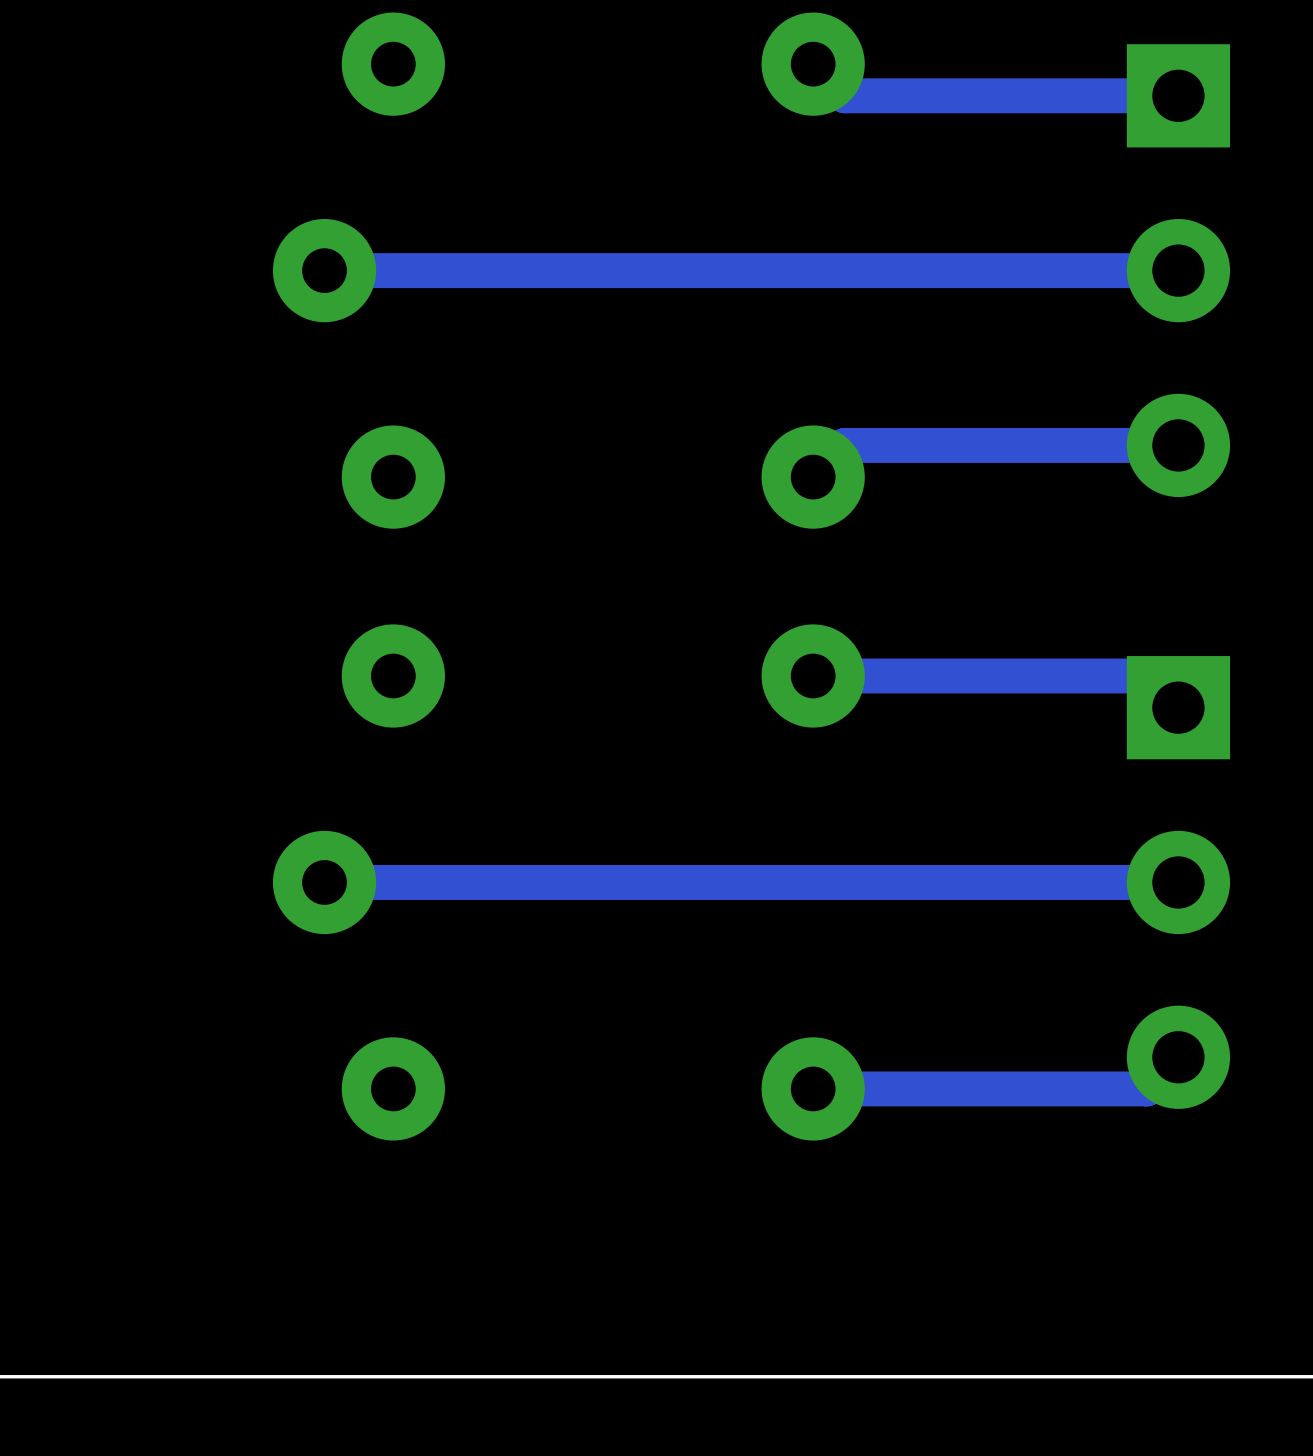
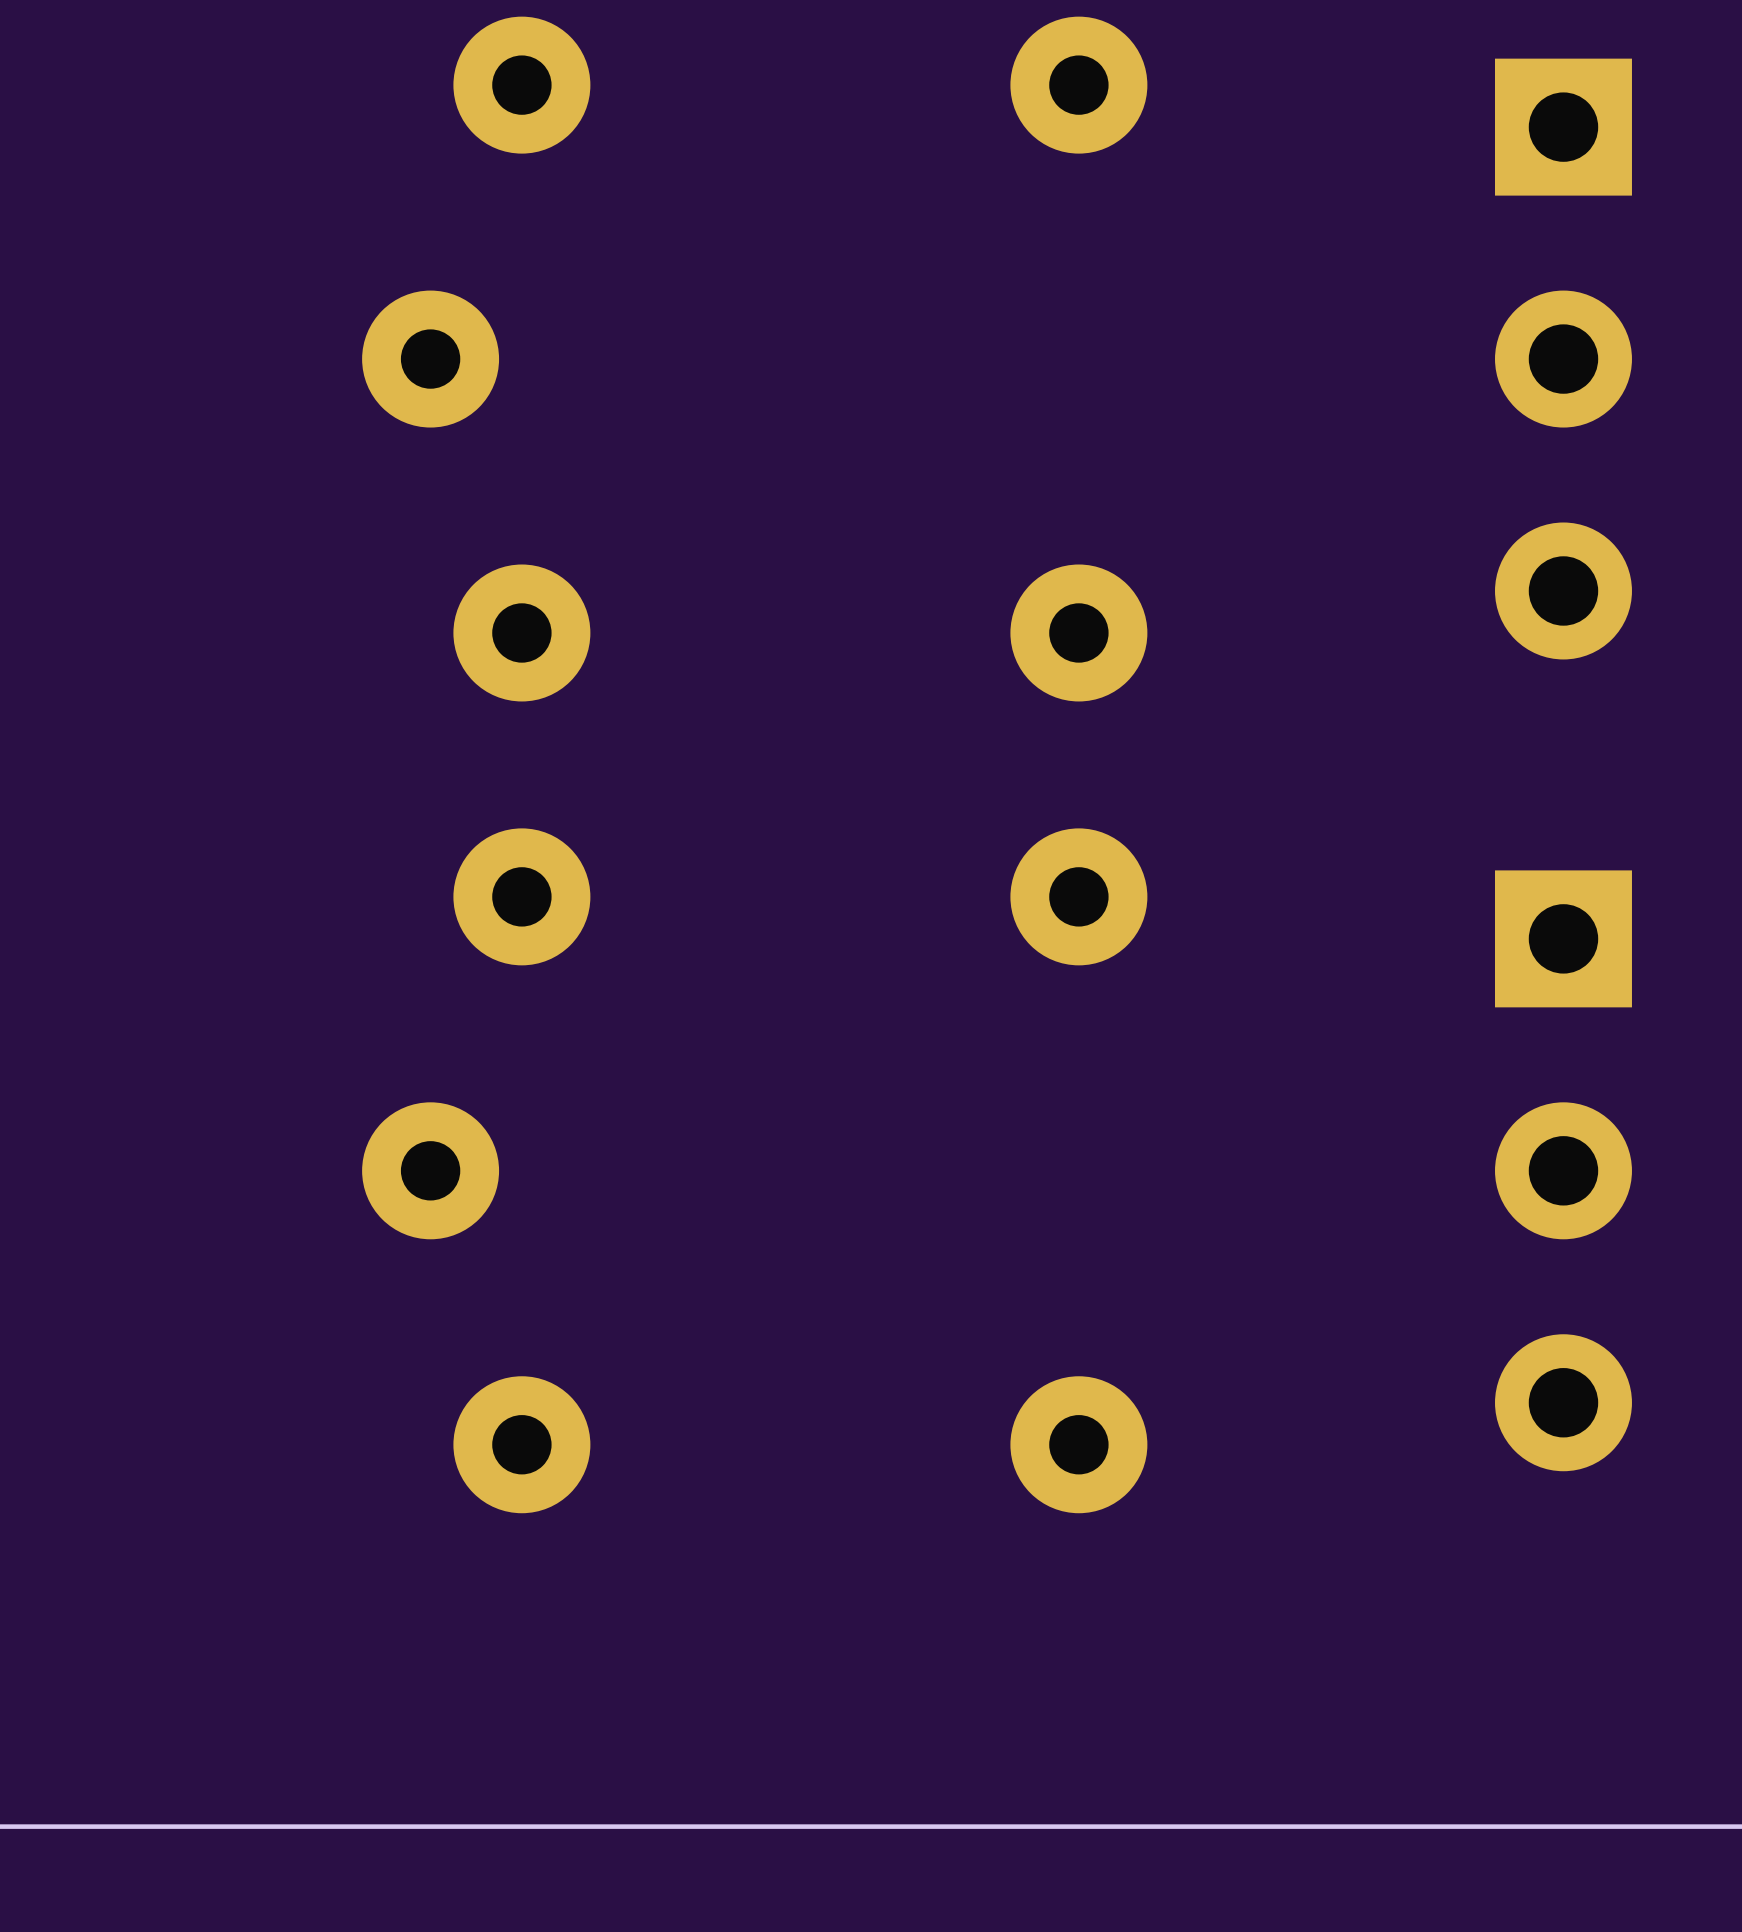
track: (813, 64) (844, 95) (1178, 95) -> none
track: (1178, 270) (324, 270) -> none
track: (1178, 445) (844, 445) (813, 477) -> none
track: (813, 675) (1146, 675) (1178, 707) -> none
track: (1178, 882) (324, 882) -> none
track: (1178, 1057) (1146, 1088) (813, 1088) -> none

